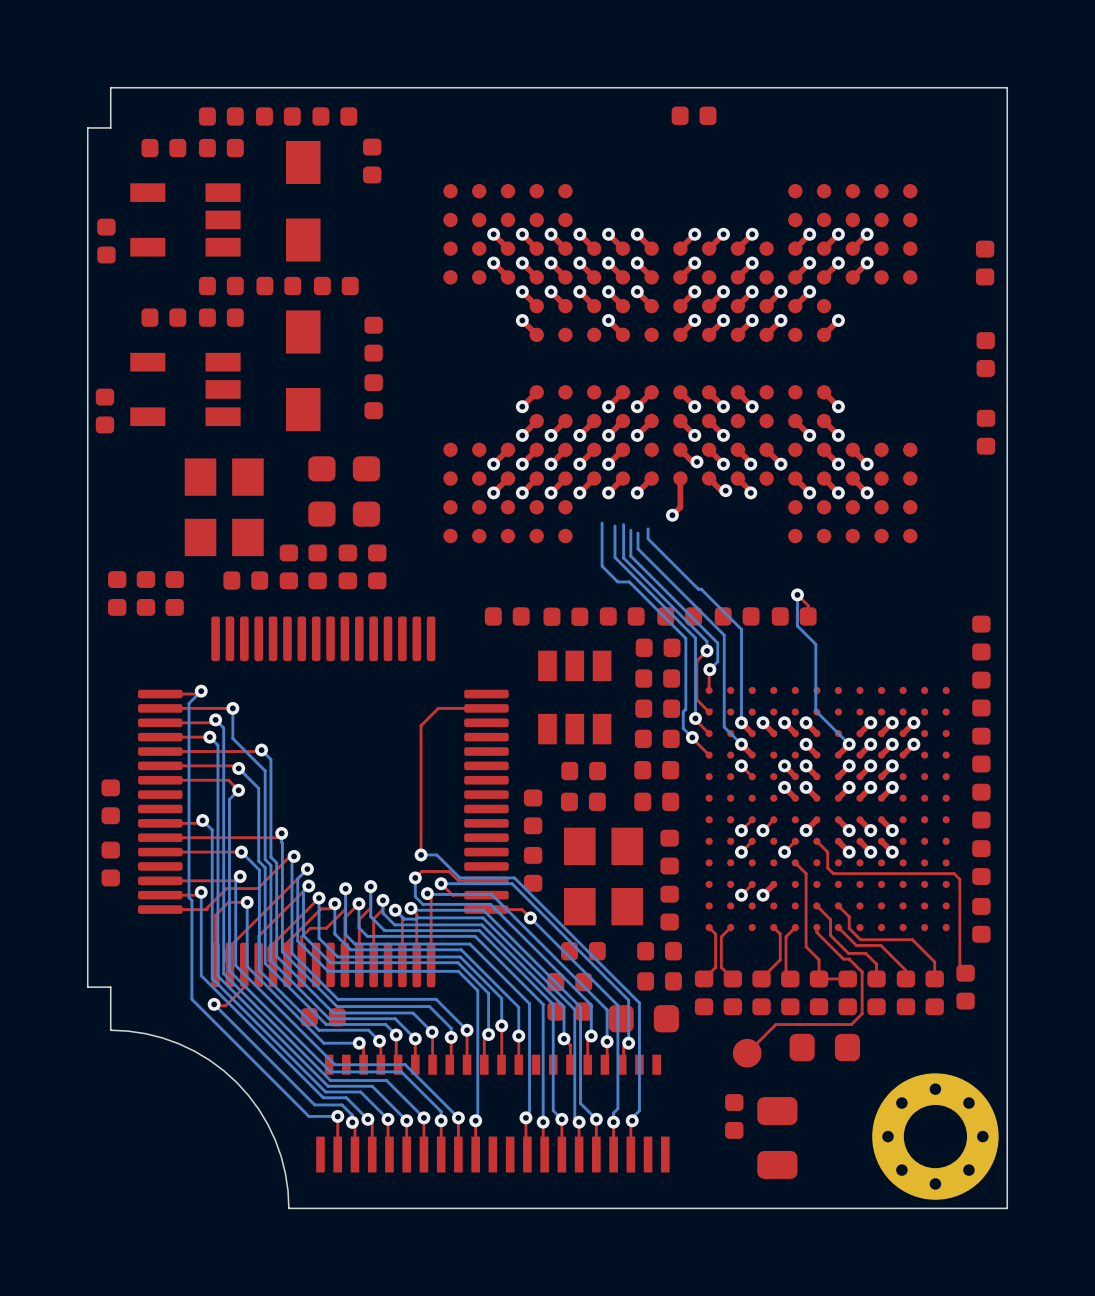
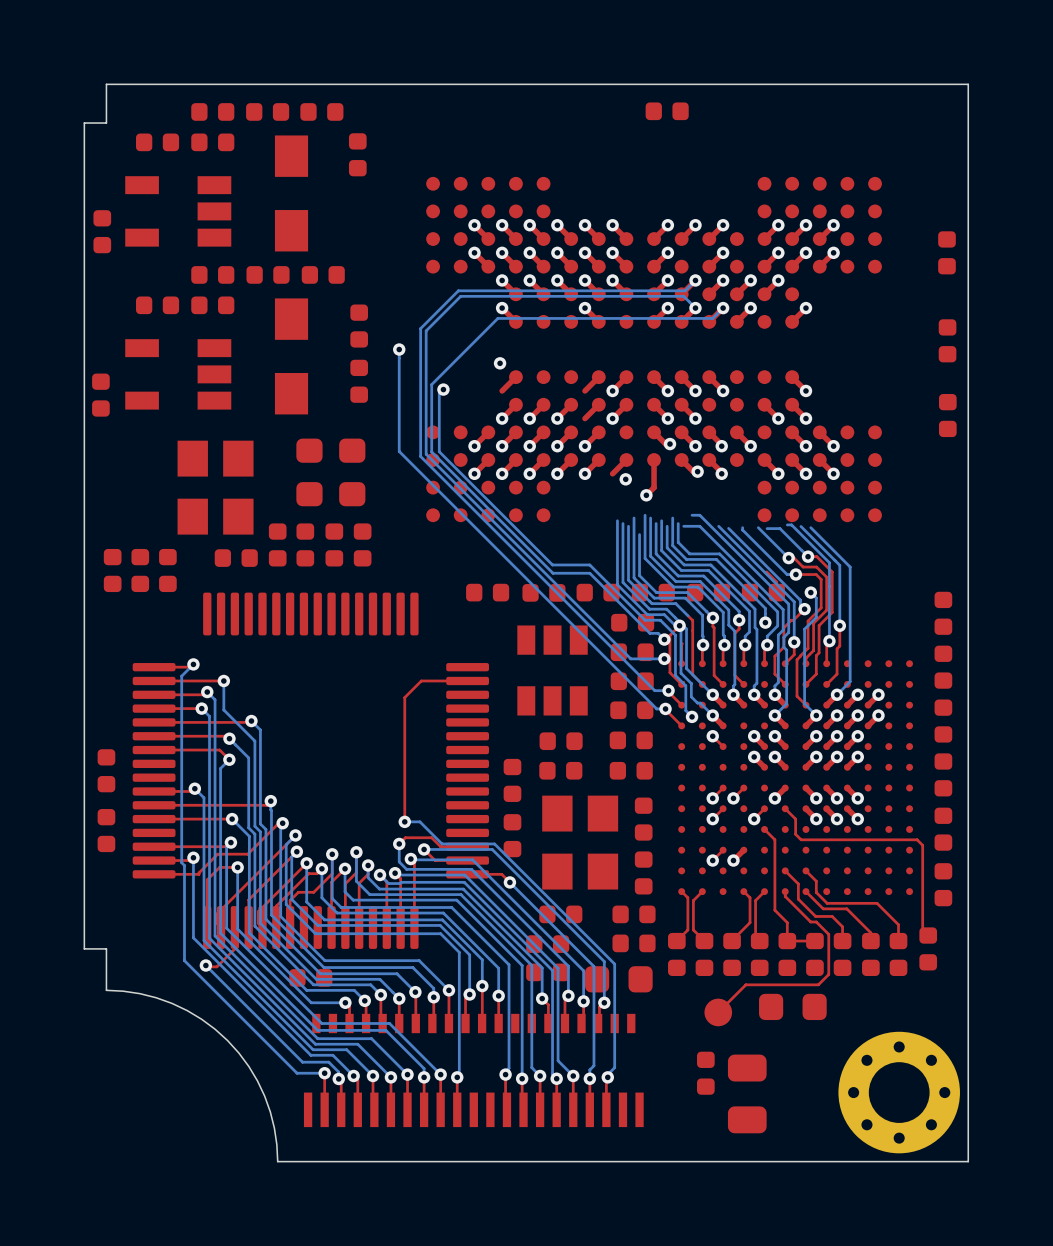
bottom track: none -> (695, 308) (683, 296) (460, 296) (426, 330) (426, 454) (630, 658) (664, 658)
bottom track: none -> (723, 308) (712, 318) (497, 318) (431, 384) (431, 451) (553, 573) (589, 573) (649, 633) (658, 633) (664, 639)
via: none -> (399, 349)
bottom track: none -> (443, 389) (439, 389) (439, 451) (552, 564) (589, 564) (645, 620) (660, 620) (675, 635) (675, 675) (685, 685) (685, 710) (692, 716)
via: none -> (443, 389)
via position: (522, 406) -> (500, 363)
via: (608, 406) -> none
via: (608, 435) -> none
via position: (637, 492) -> (625, 479)
bottom track: (602, 523) (602, 566) (617, 581) (629, 581) (685, 638) (685, 709) (683, 711) (683, 728) (692, 737) -> (399, 349) (399, 451) (656, 708) (665, 708)
bottom track: (623, 524) (623, 558) (706, 641) (706, 650) -> none
bottom track: (615, 525) (615, 557) (695, 638) (695, 718) -> (695, 280) (685, 290) (458, 290) (420, 328) (420, 456) (654, 690) (668, 690)
bottom track: (648, 528) (648, 538) (741, 629) (741, 722) -> (622, 523) (622, 582) (649, 609) (666, 609) (686, 628) (686, 668) (712, 694)
bottom track: (630, 530) (630, 556) (717, 643) (717, 661) (709, 669) -> none
bottom track: (638, 533) (638, 548) (724, 635) (724, 727) (728, 731) -> (617, 520) (617, 584) (647, 614) (664, 614) (680, 631) (680, 673) (691, 683) (691, 696) (697, 703) (700, 703)
bottom track: none -> (645, 515) (645, 558) (673, 587) (697, 587) (723, 612) (724, 645)
bottom track: none -> (692, 515) (699, 515) (788, 604) (788, 632) (783, 637) (783, 647) (786, 650) (786, 703) (774, 715)
bottom track: none -> (634, 518) (634, 577) (654, 598) (685, 598) (702, 615) (703, 645)
bottom track: none -> (650, 518) (650, 556) (675, 581) (700, 581) (728, 610) (728, 625) (734, 631) (733, 694)
bottom track: none -> (672, 518) (672, 545) (686, 559) (716, 559) (765, 608) (765, 622)
bottom track: none -> (661, 520) (661, 550) (681, 570) (708, 570) (749, 611) (749, 631) (745, 636) (745, 645)
bottom track: none -> (656, 523) (656, 553) (678, 576) (703, 576) (739, 611) (739, 620)
bottom track: none -> (678, 523) (678, 542) (689, 553) (719, 553) (777, 611) (777, 625) (767, 636) (767, 645)
bottom track: none -> (787, 524) (791, 524) (829, 562) (829, 641)
bottom track: none -> (628, 526) (628, 580) (651, 603) (675, 603) (688, 615)
bottom track: none -> (667, 526) (667, 547) (684, 564) (710, 564) (755, 609) (756, 683) (754, 686) (754, 694)
bottom track: none -> (683, 526) (699, 526) (783, 609) (783, 630) (778, 635) (778, 682) (774, 686) (774, 694)
bottom track: none -> (718, 526) (794, 601) (794, 642)
bottom track: none -> (800, 526) (839, 565) (839, 625)
bottom track: none -> (742, 527) (742, 530) (787, 574) (795, 574)
bottom track: none -> (758, 527) (788, 558)
bottom track: none -> (810, 527) (850, 567) (850, 681) (837, 694)
bottom track: none -> (728, 528) (800, 600) (800, 605) (804, 609)
bottom track: none -> (767, 528) (779, 528) (808, 556)
bottom track: none -> (639, 534) (639, 575) (656, 592) (687, 592) (712, 617)
top track: none -> (808, 556) (816, 556) (832, 572) (832, 612) (819, 625) (819, 652) (816, 655) (816, 674) (805, 684)
via: none -> (808, 556)
top track: none -> (788, 558) (794, 558) (803, 567) (816, 567) (826, 577) (826, 610) (813, 623) (813, 650) (805, 658) (805, 663)
via: none -> (788, 558)
bottom track: (797, 594) (797, 626) (815, 644) (815, 710) (837, 732) -> (810, 592) (816, 598) (816, 617) (804, 629) (804, 703)
via: (797, 594) -> none
top track: none -> (795, 574) (816, 574) (821, 579) (821, 607) (808, 621) (808, 648) (800, 655)
via: none -> (795, 574)
via: none -> (810, 592)
top track: none -> (804, 609) (783, 627) (783, 647) (774, 656) (774, 674) (785, 684)
via: none -> (804, 609)
top track: none -> (688, 615) (692, 620) (692, 674) (702, 684)
top track: none -> (712, 617) (714, 675) (723, 684)
via: none -> (712, 617)
top track: none -> (739, 620) (739, 629) (734, 633) (734, 675) (743, 684)
via: none -> (739, 620)
via: none -> (765, 622)
top track: none -> (839, 625) (837, 674) (826, 684)
via: none -> (839, 625)
via: none -> (664, 639)
top track: none -> (829, 641) (826, 643) (826, 663)
via: none -> (829, 641)
top track: none -> (794, 642) (794, 654) (785, 663)
via: none -> (794, 642)
via: (709, 669) -> none
top track: none -> (703, 645) (702, 663)
via: none -> (703, 645)
top track: none -> (724, 645) (723, 663)
via: none -> (724, 645)
top track: none -> (745, 645) (743, 663)
via: none -> (745, 645)
top track: none -> (767, 645) (764, 647) (764, 663)
via: none -> (767, 645)
top track: none -> (800, 656) (797, 659) (797, 696) (805, 705)
via: none -> (664, 658)
via: none -> (692, 716)

